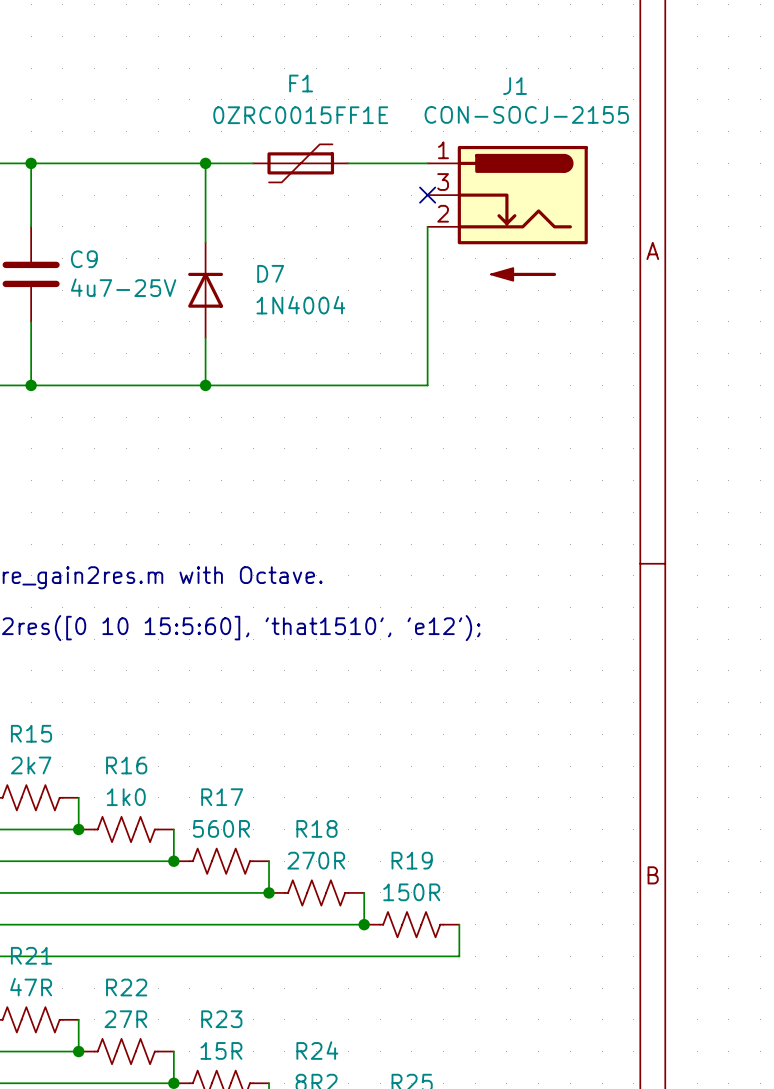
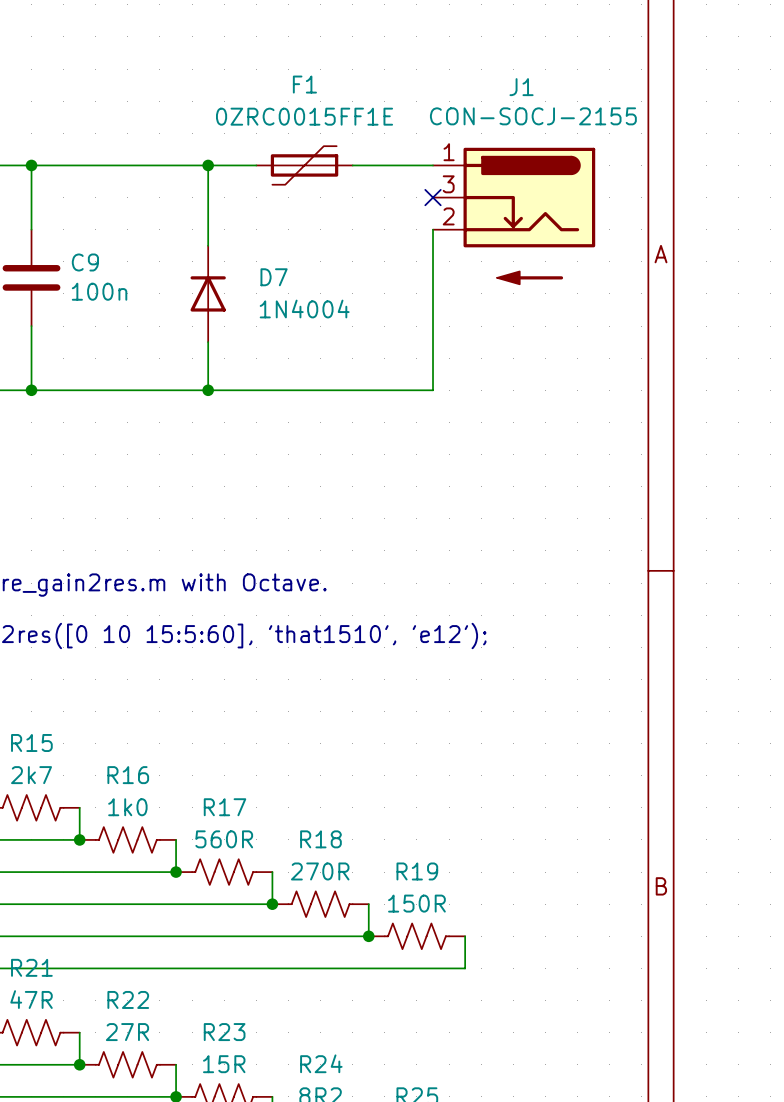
C9 value: 4u7-25V (123, 287) -> 100n (99, 291)

